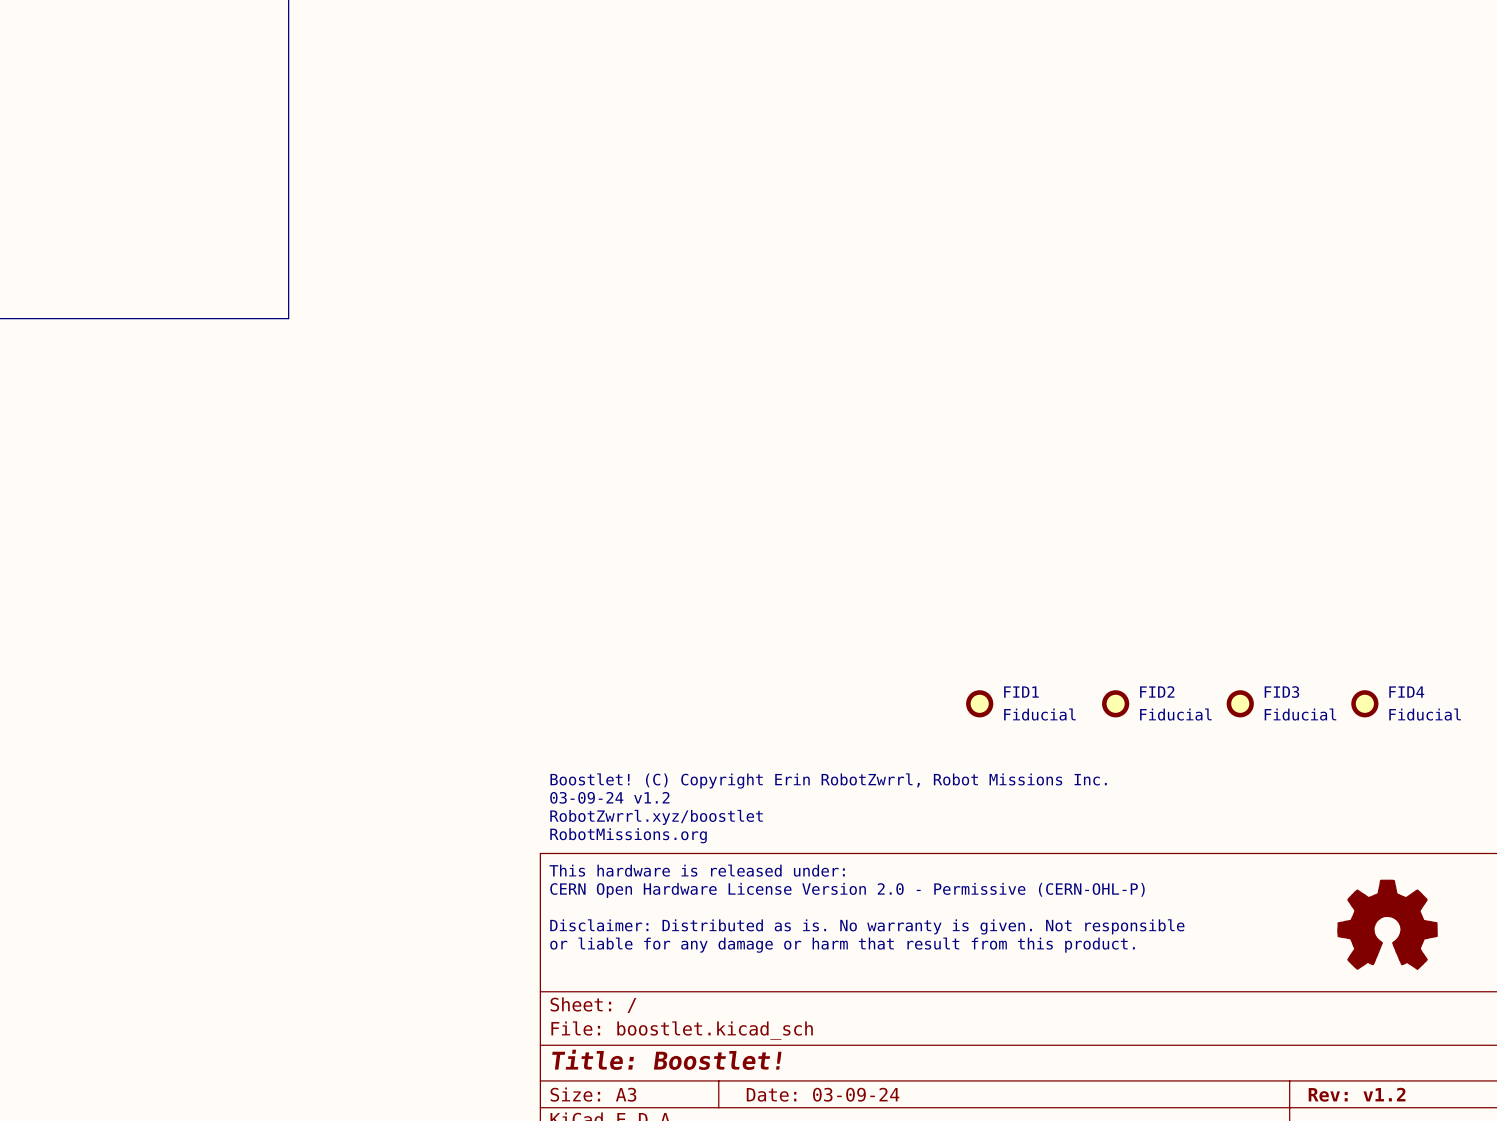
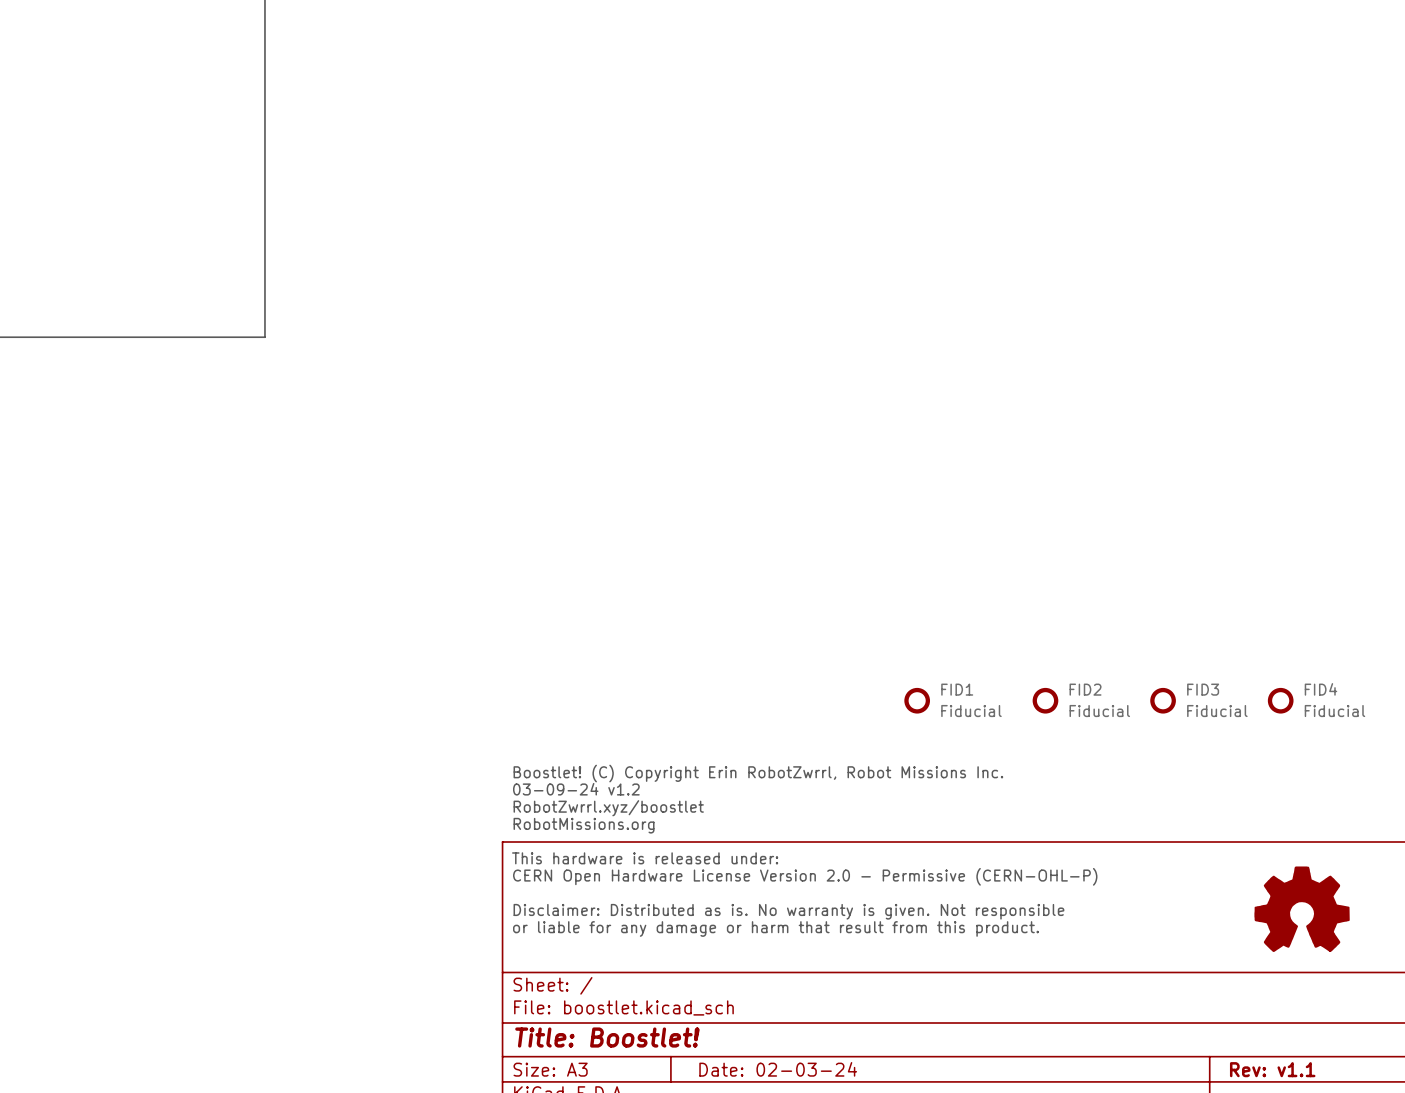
title block: Date: 03-09-24 (823, 1094) -> Date: 02-03-24 (778, 1069)
title block: Rev: v1.2 (1357, 1094) -> Rev: v1.1 (1272, 1069)

